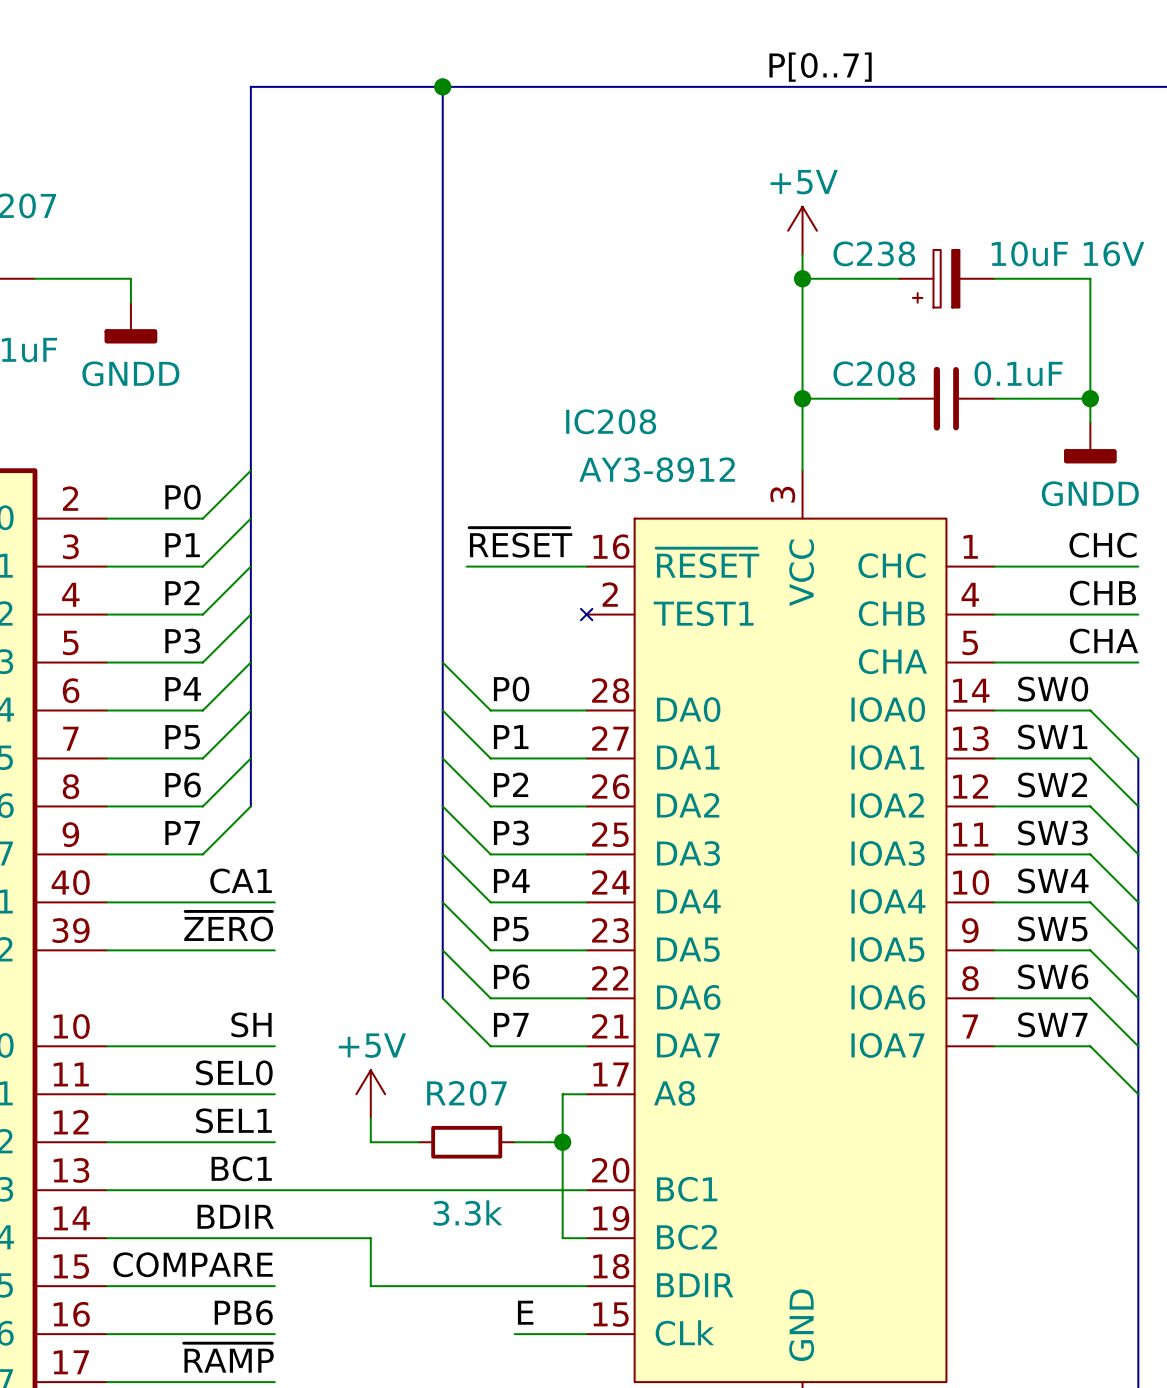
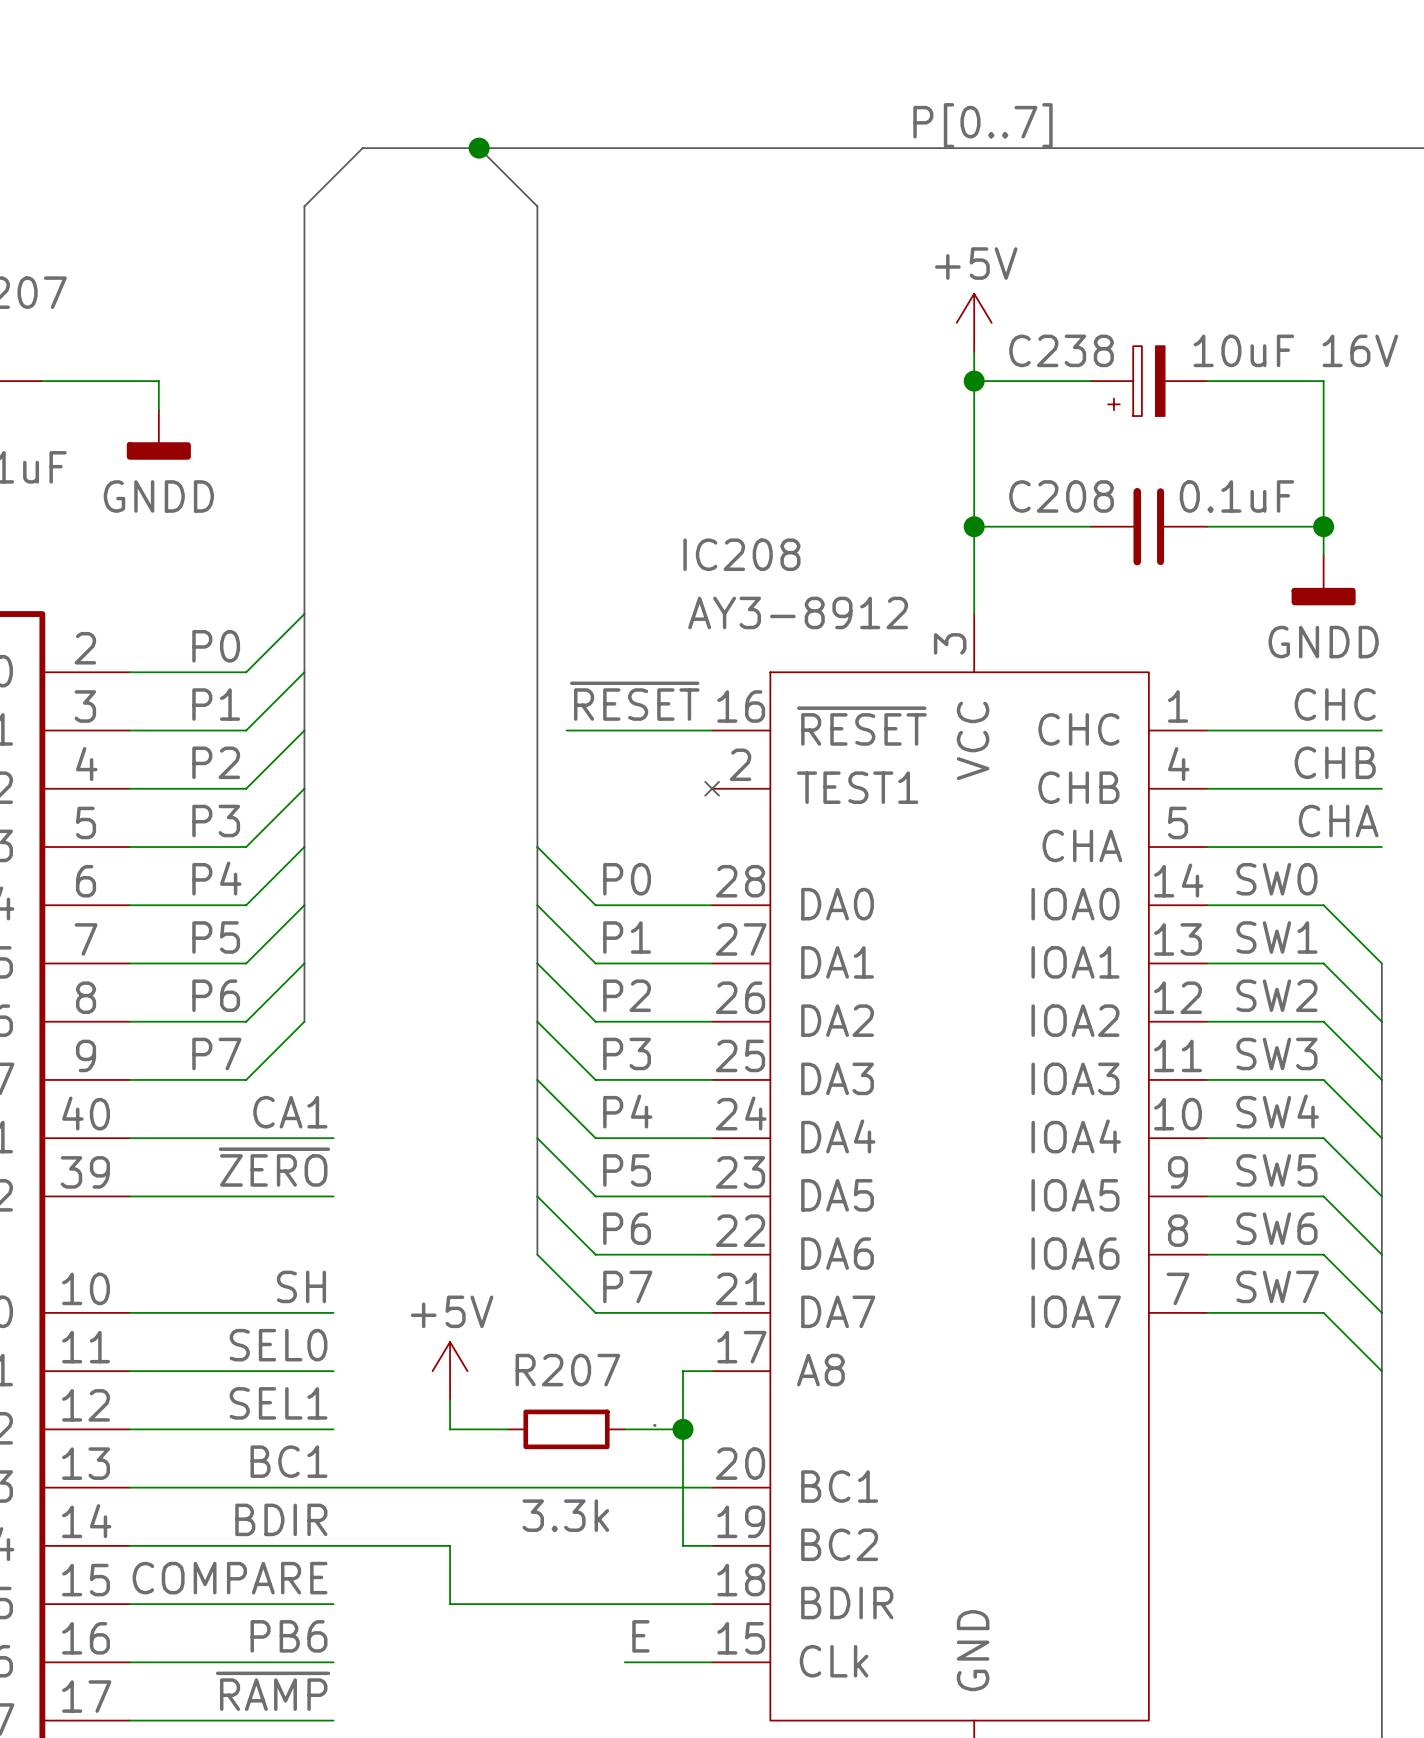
bus: (298, 86) (250, 86) (250, 134) -> (362, 148) (304, 206)
bus: (442, 86) (442, 134) -> (479, 148) (537, 206)
junction position: (442, 86) -> (479, 148)

